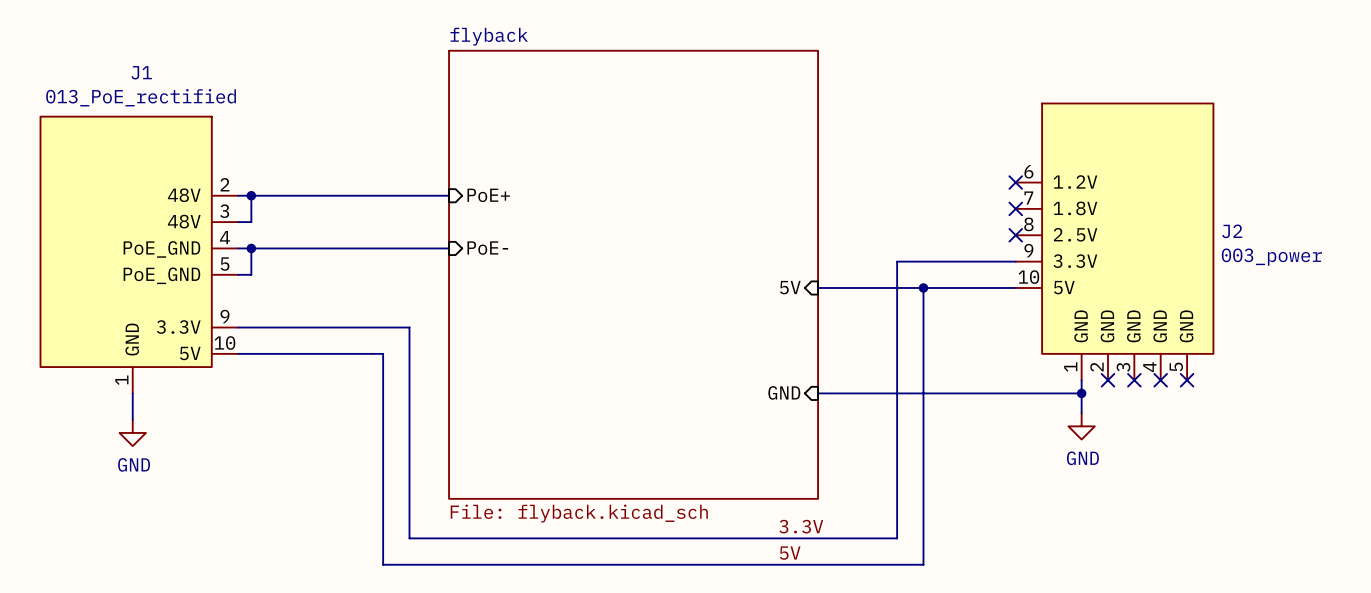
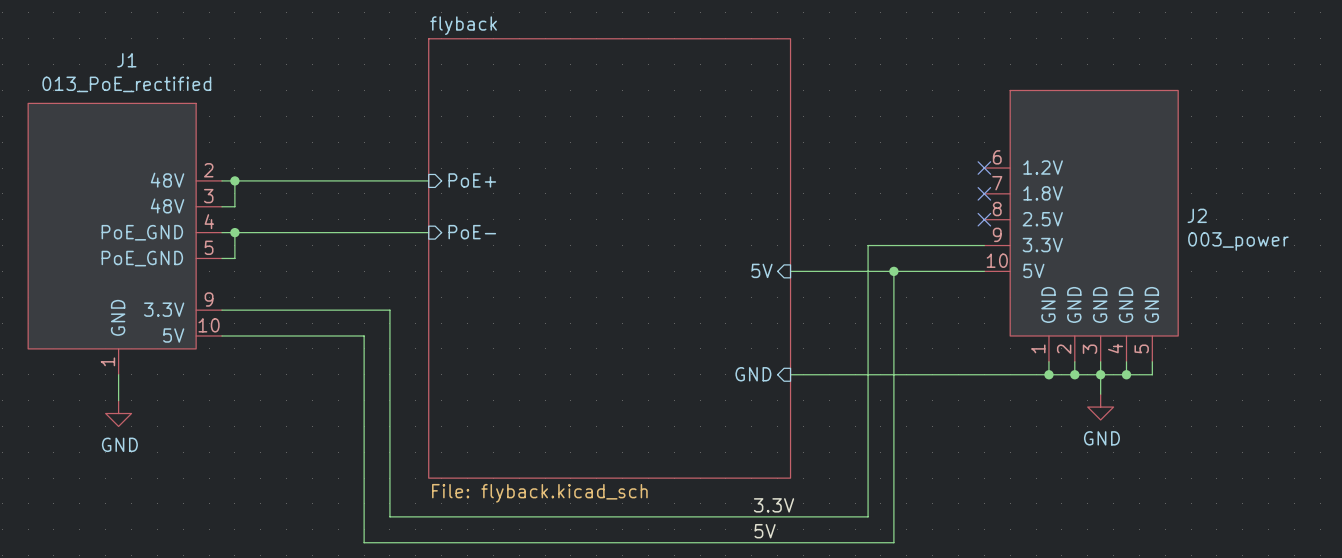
wire: none -> (1074, 361) (1074, 374)
no-connect mark: (1107, 380) -> none
wire: none -> (1100, 361) (1100, 394)
no-connect mark: (1134, 380) -> none
wire: none -> (1126, 361) (1126, 374)
no-connect mark: (1160, 380) -> none
no-connect mark: (1187, 380) -> none
wire: (1081, 393) (1081, 413) -> (1048, 374) (1152, 374) (1152, 361)
junction: none -> (1074, 374)
junction: none -> (1100, 374)
junction: none -> (1126, 374)
power symbol position: GND (1081, 426) -> GND (1100, 407)

